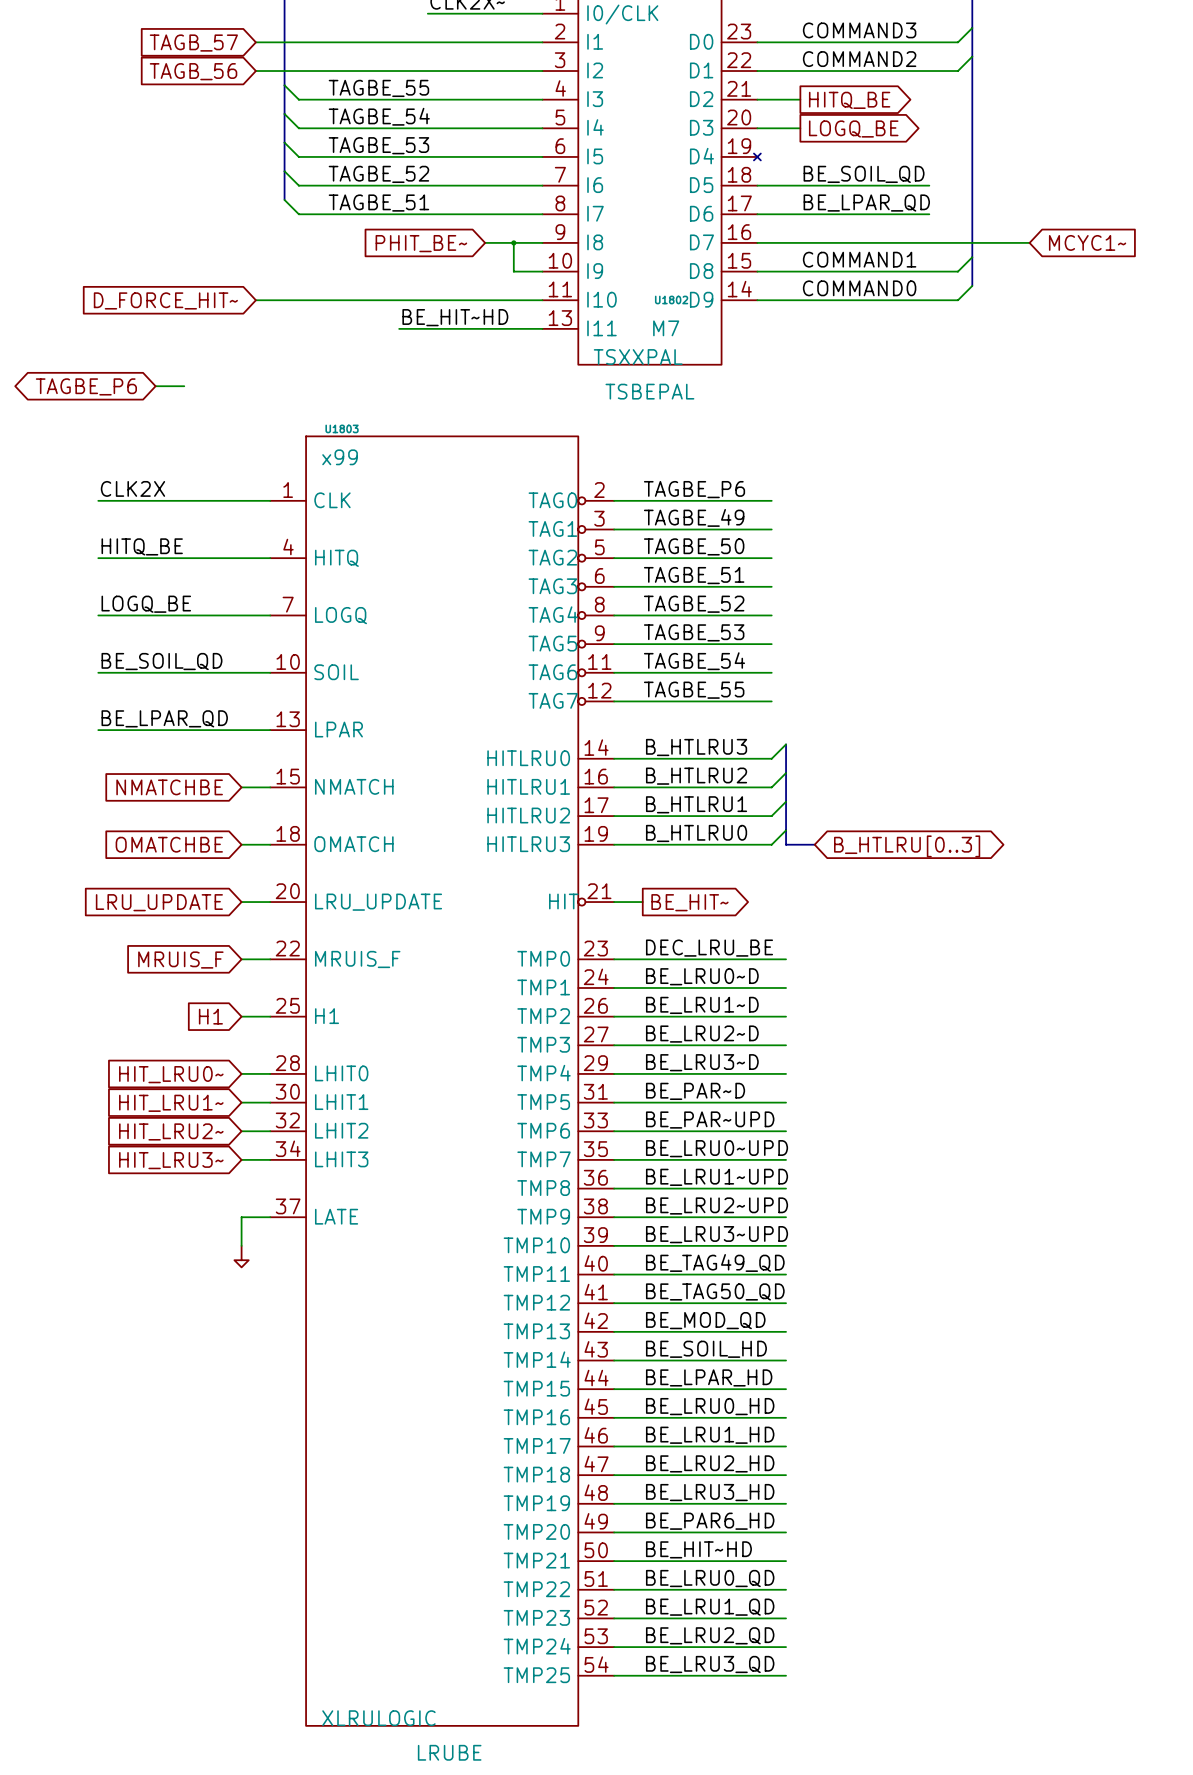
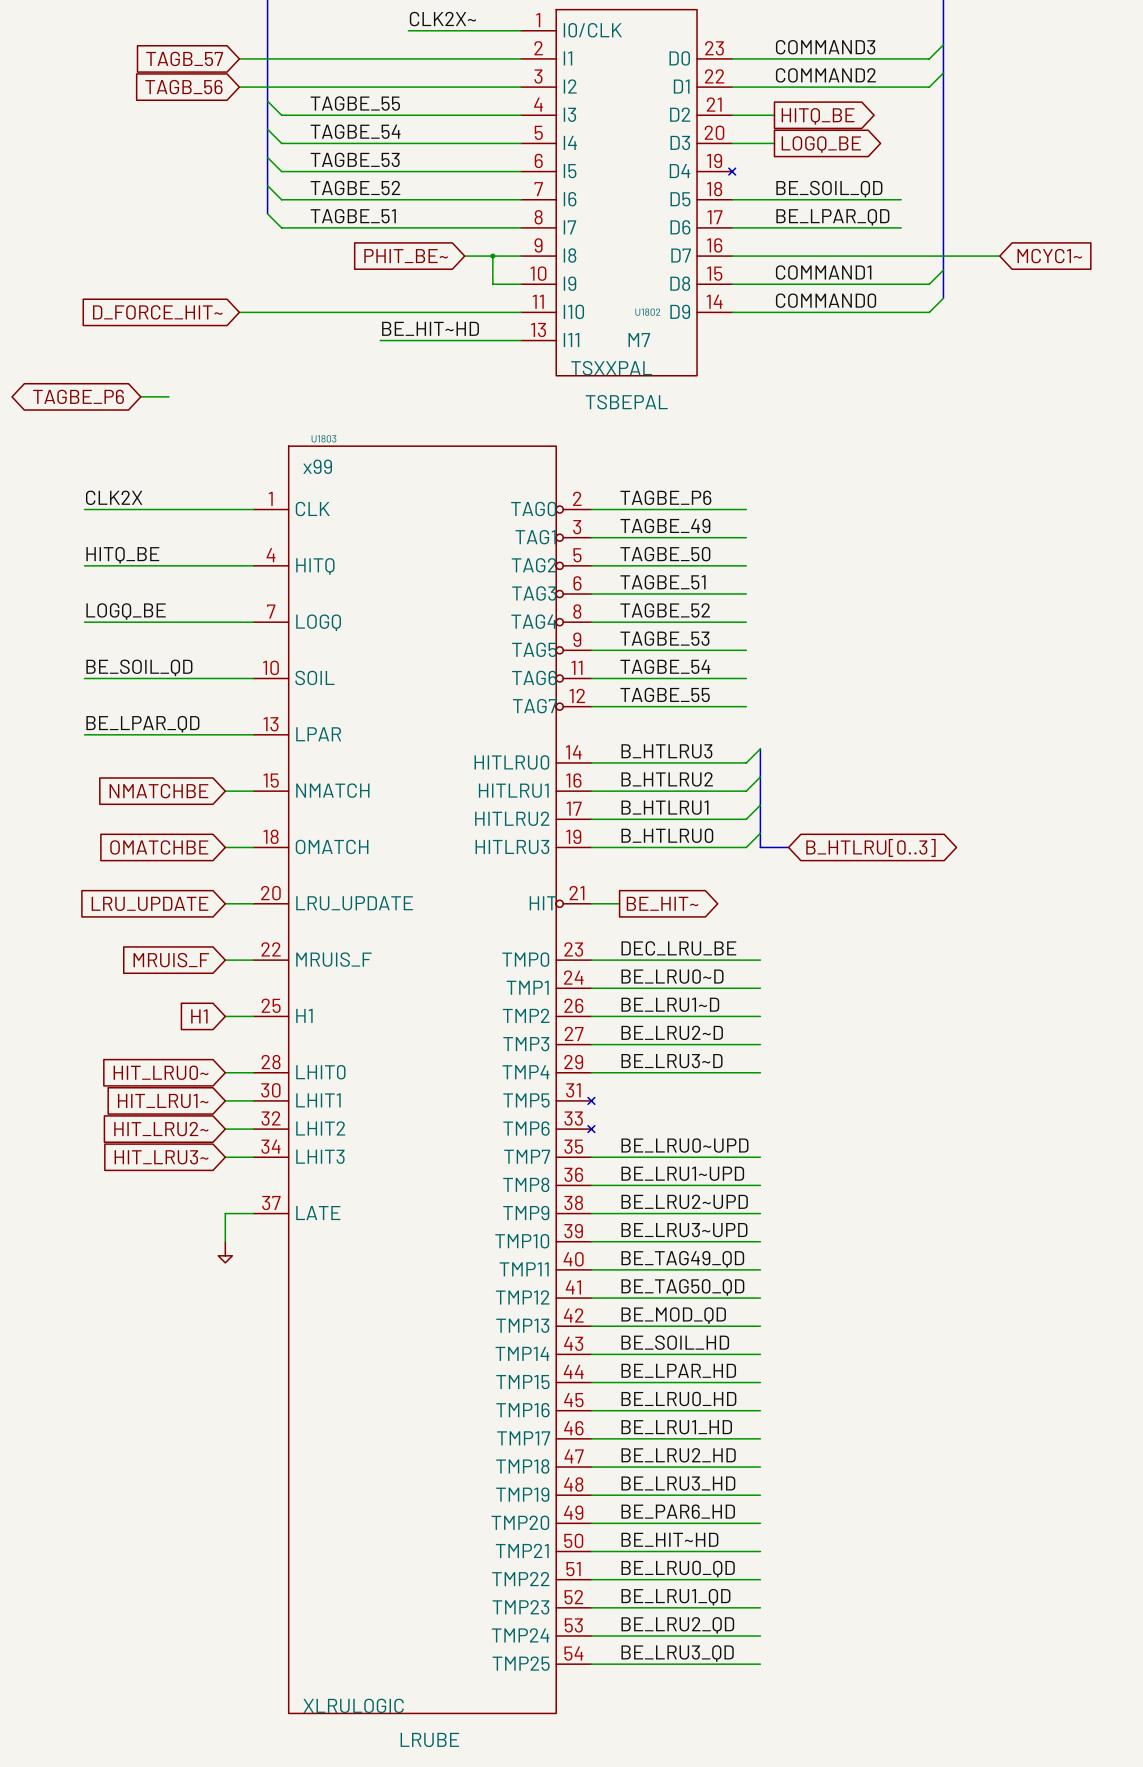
label: BE_PAR~D (695, 1091) -> none
wire: (614, 1102) (786, 1102) -> none
no-connect mark: none -> (591, 1100)
label: BE_PAR~UPD (710, 1120) -> none
wire: (614, 1131) (786, 1131) -> none
no-connect mark: none -> (591, 1129)

